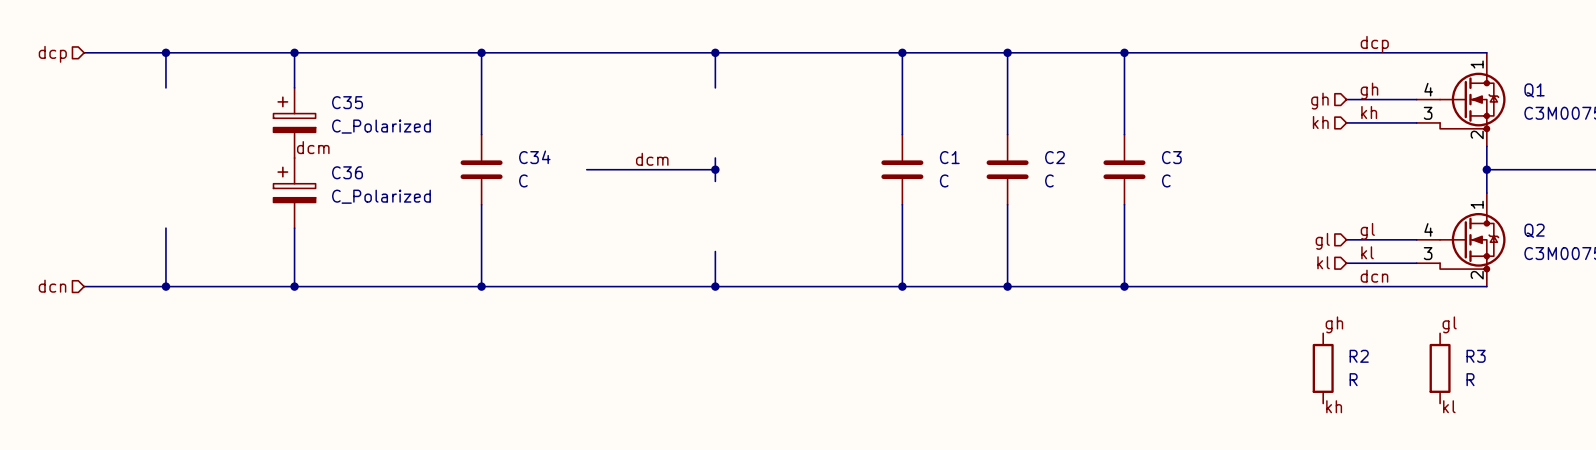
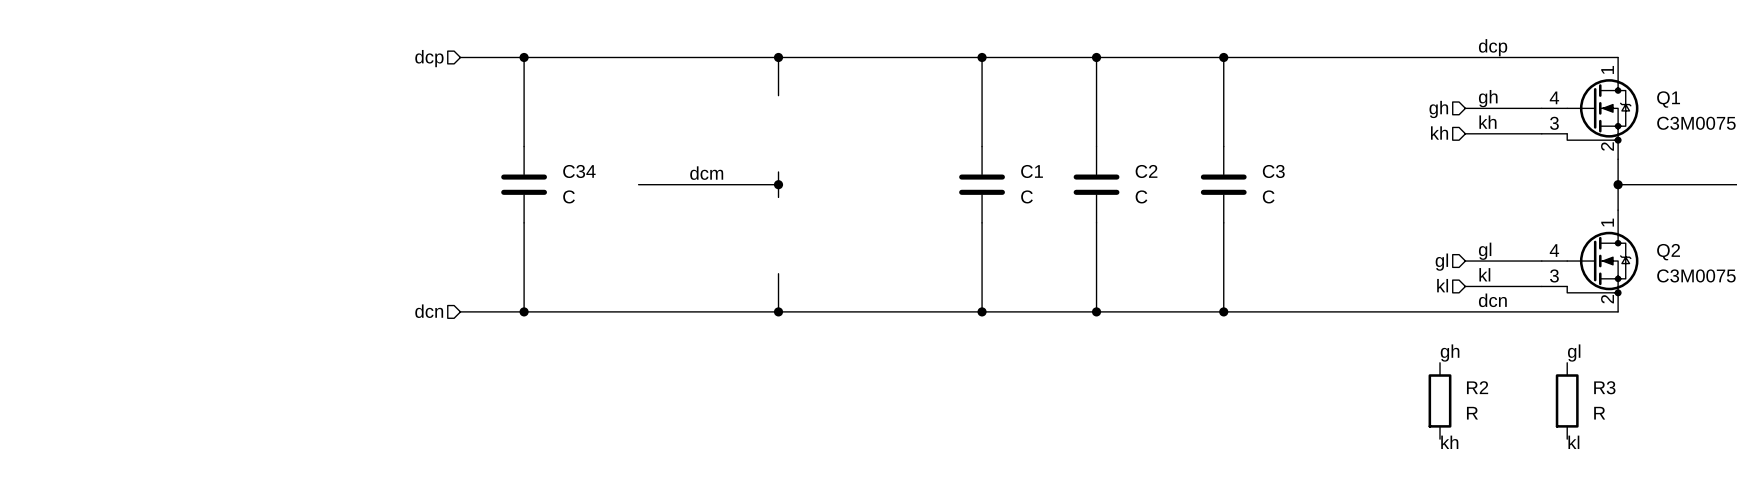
wire: (84, 52) (423, 52) -> none
wire: (165, 52) (165, 87) -> none
junction: (165, 52) -> none
wire: (294, 52) (294, 87) -> none
junction: (294, 52) -> none
hierarchical label: dcp (52, 54) -> none
hierarchical label: none -> dcp (429, 58)
C35: C_Polarized (294, 122) -> none
label: dcm (313, 147) -> none
C36: C_Polarized (294, 193) -> none
wire: (165, 228) (165, 286) -> none
wire: (294, 228) (294, 286) -> none
hierarchical label: dcn (52, 286) -> none
wire: (84, 286) (423, 286) -> none
junction: (165, 286) -> none
junction: (294, 286) -> none
hierarchical label: none -> dcn (429, 311)

